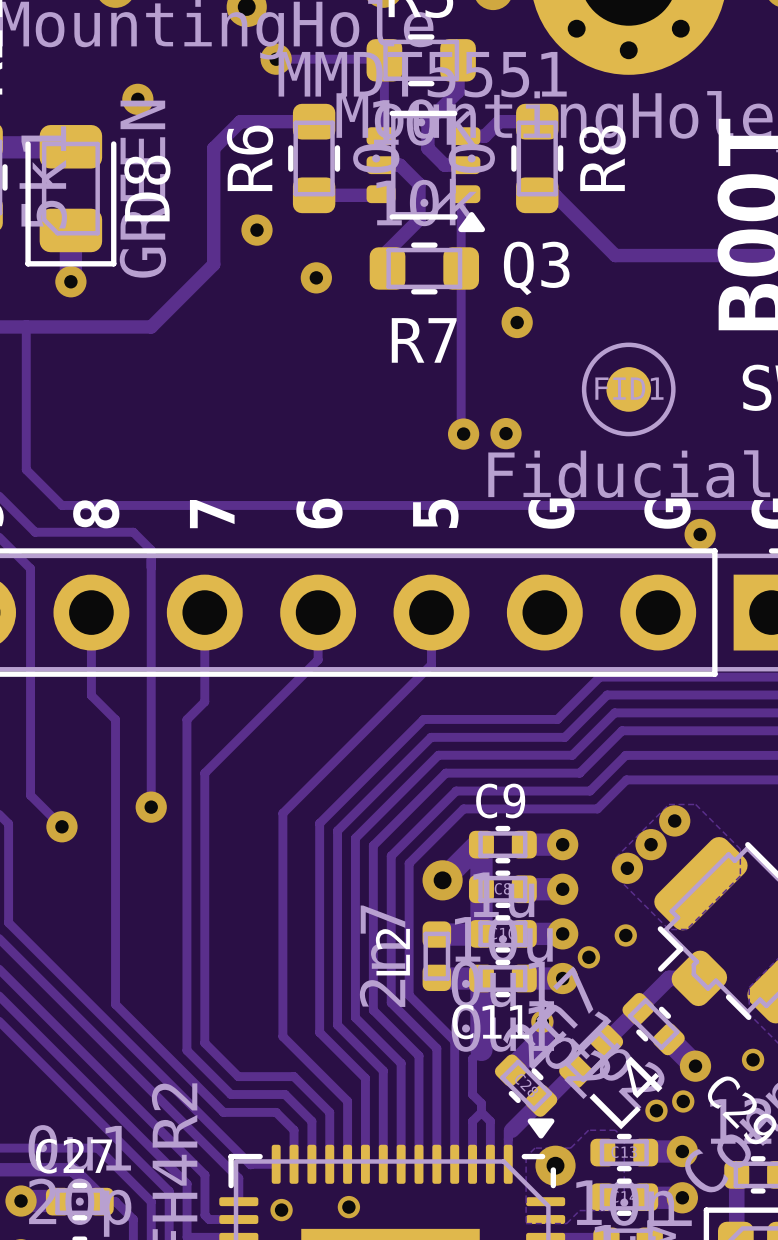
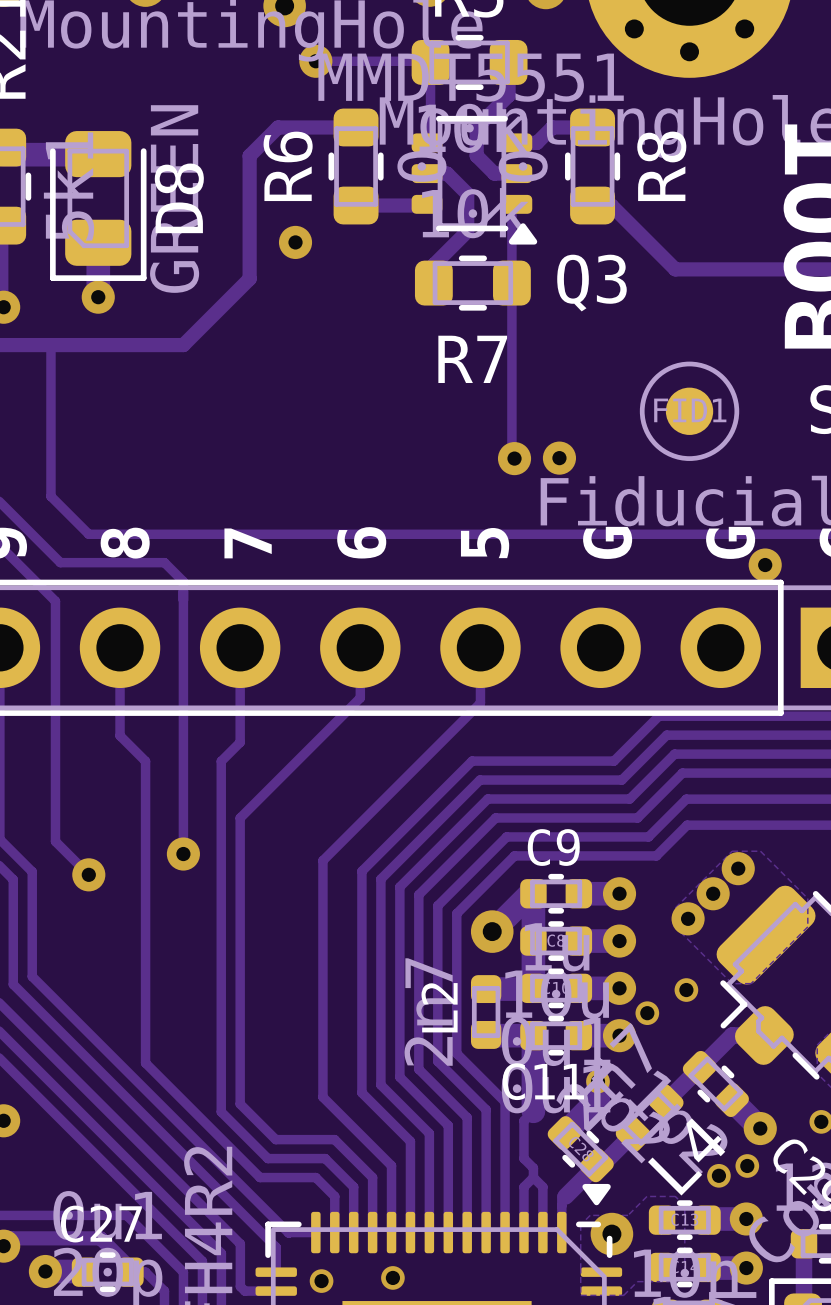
via: (137, 99) -> none
via: (316, 277) -> none
via: (517, 322) -> none

